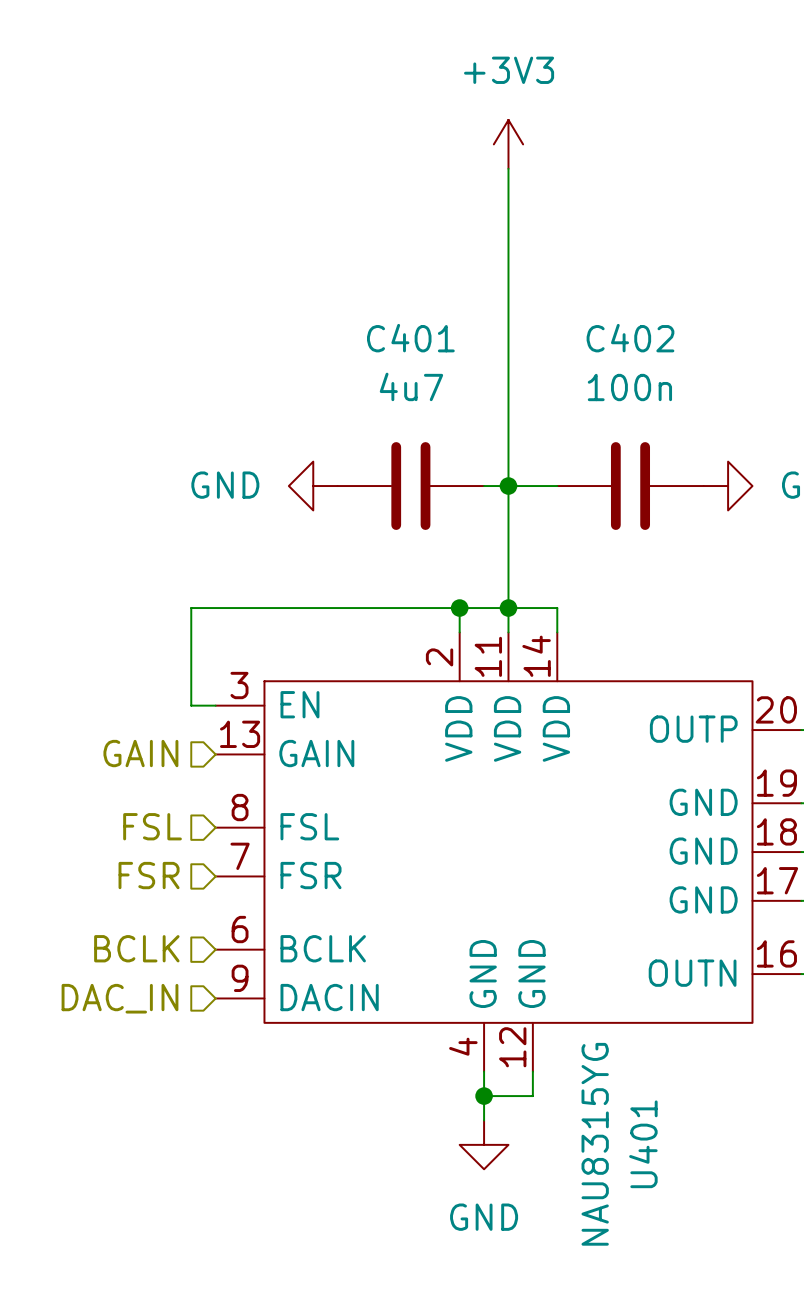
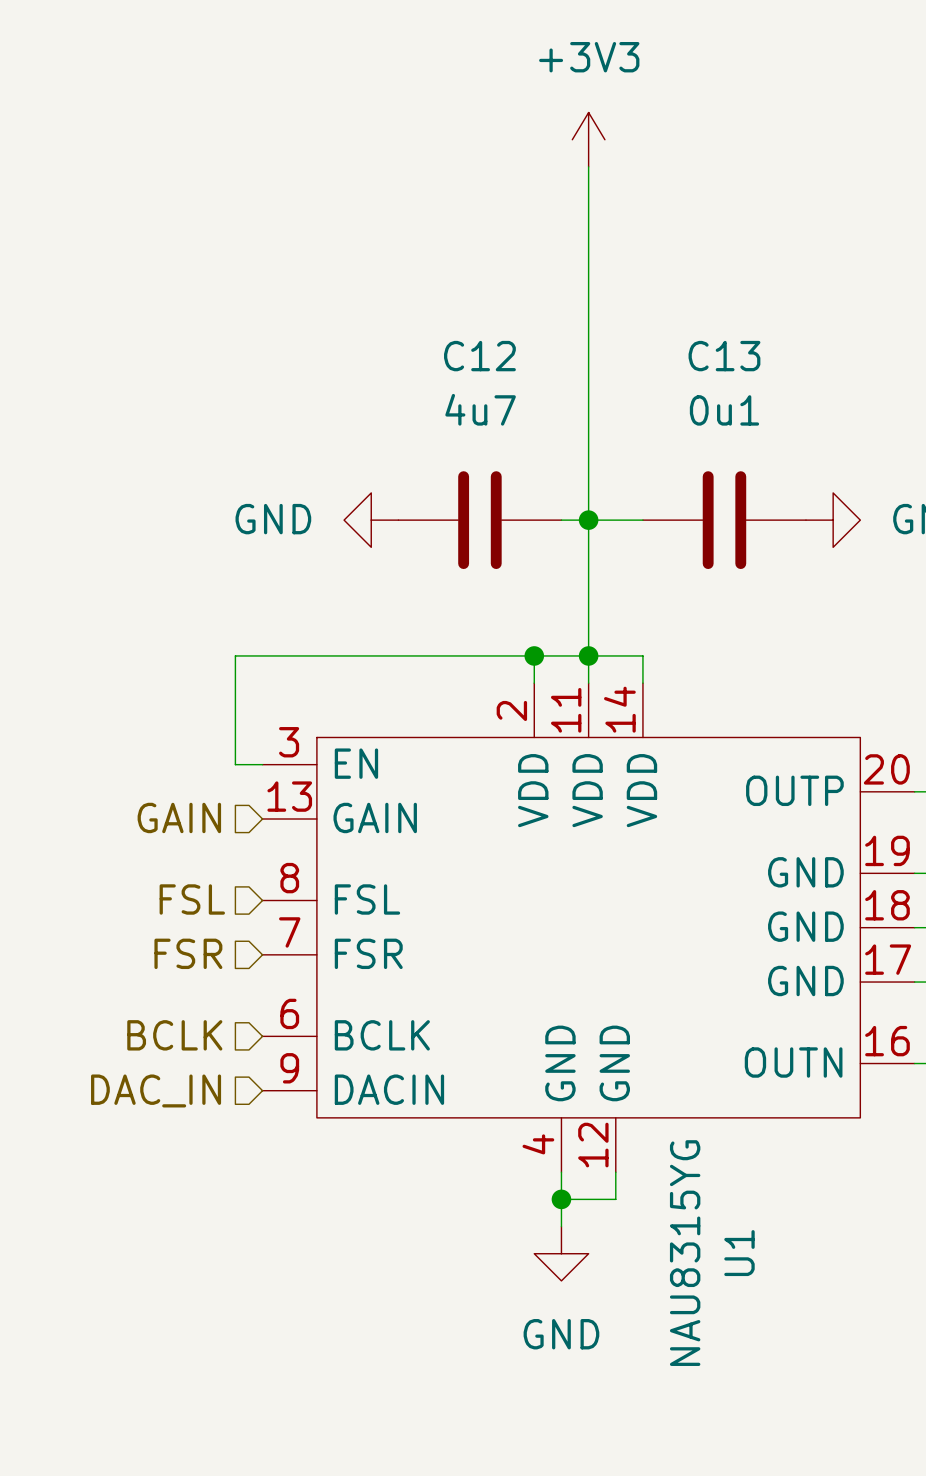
C401 name: C401 (410, 338) -> C12 (479, 356)
C402 name: C402 (630, 338) -> C13 (724, 356)
C402 value: 100n (629, 387) -> 0u1 (724, 410)
U401 name: U401 (643, 1144) -> U1 (739, 1253)

